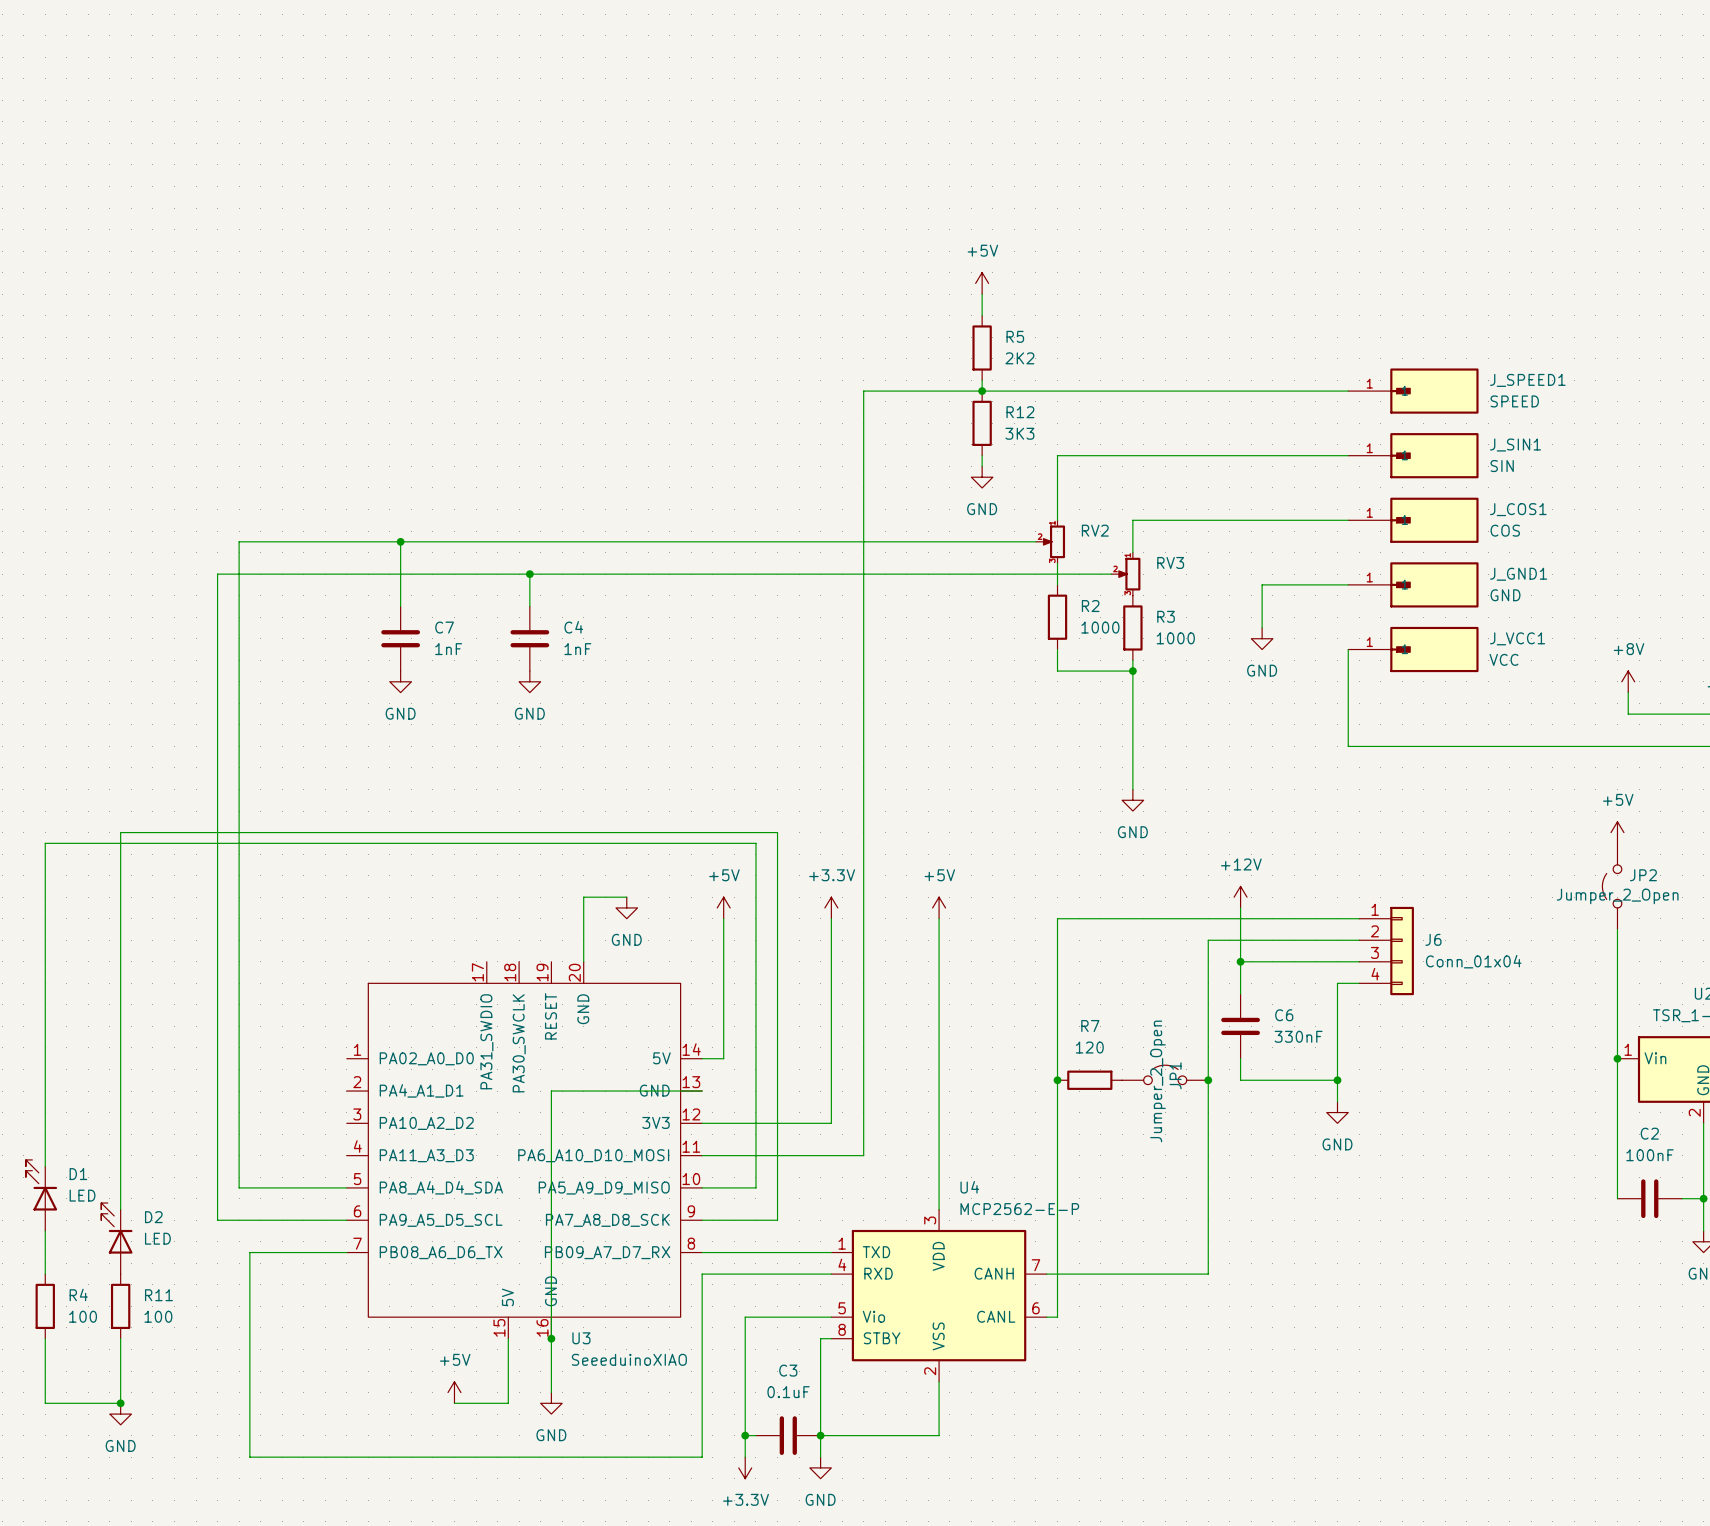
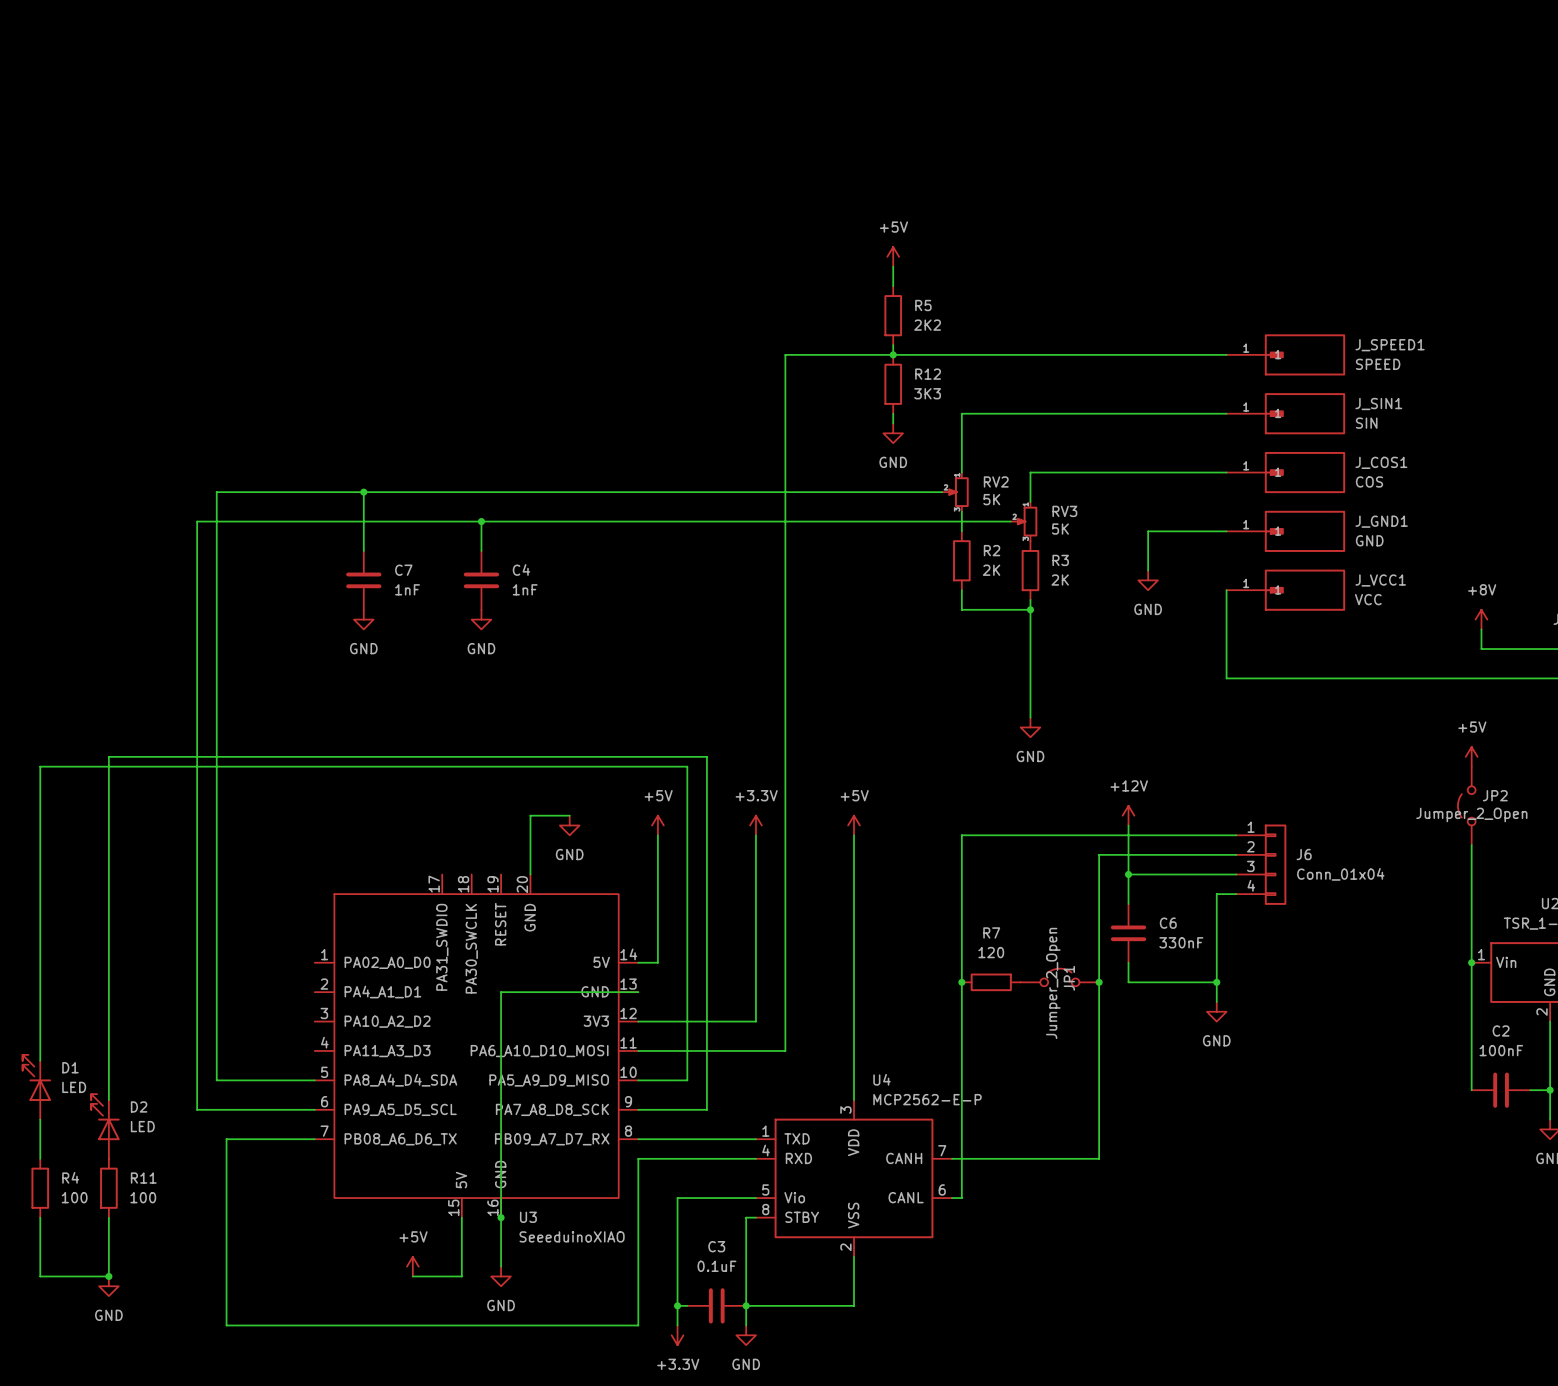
RV2 value: none -> 5K (991, 499)
RV3 value: none -> 5K (1060, 529)
R2 value: 1000 (1100, 627) -> 2K (991, 570)
R3 value: 1000 (1175, 638) -> 2K (1060, 580)

